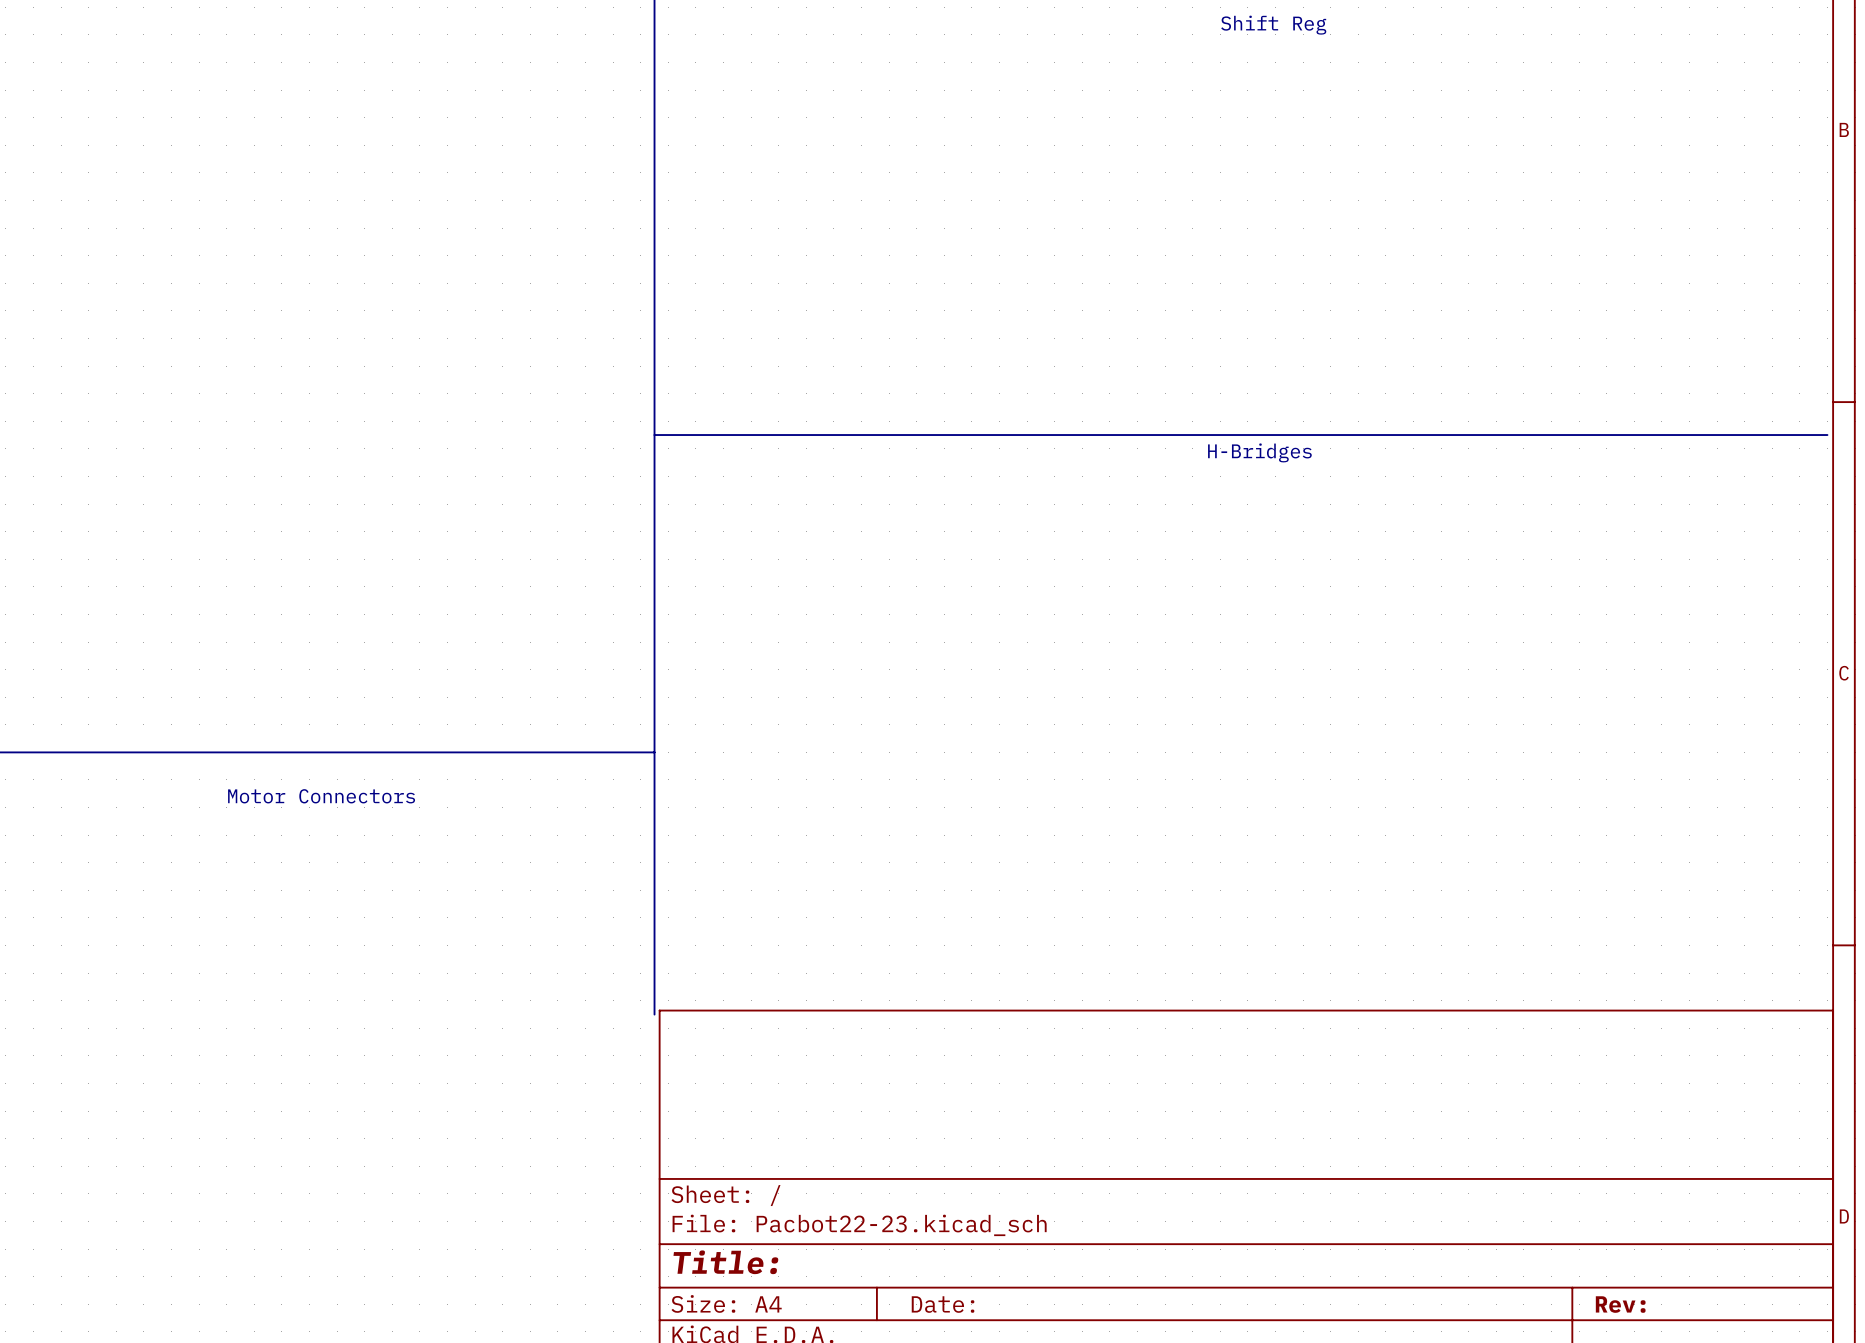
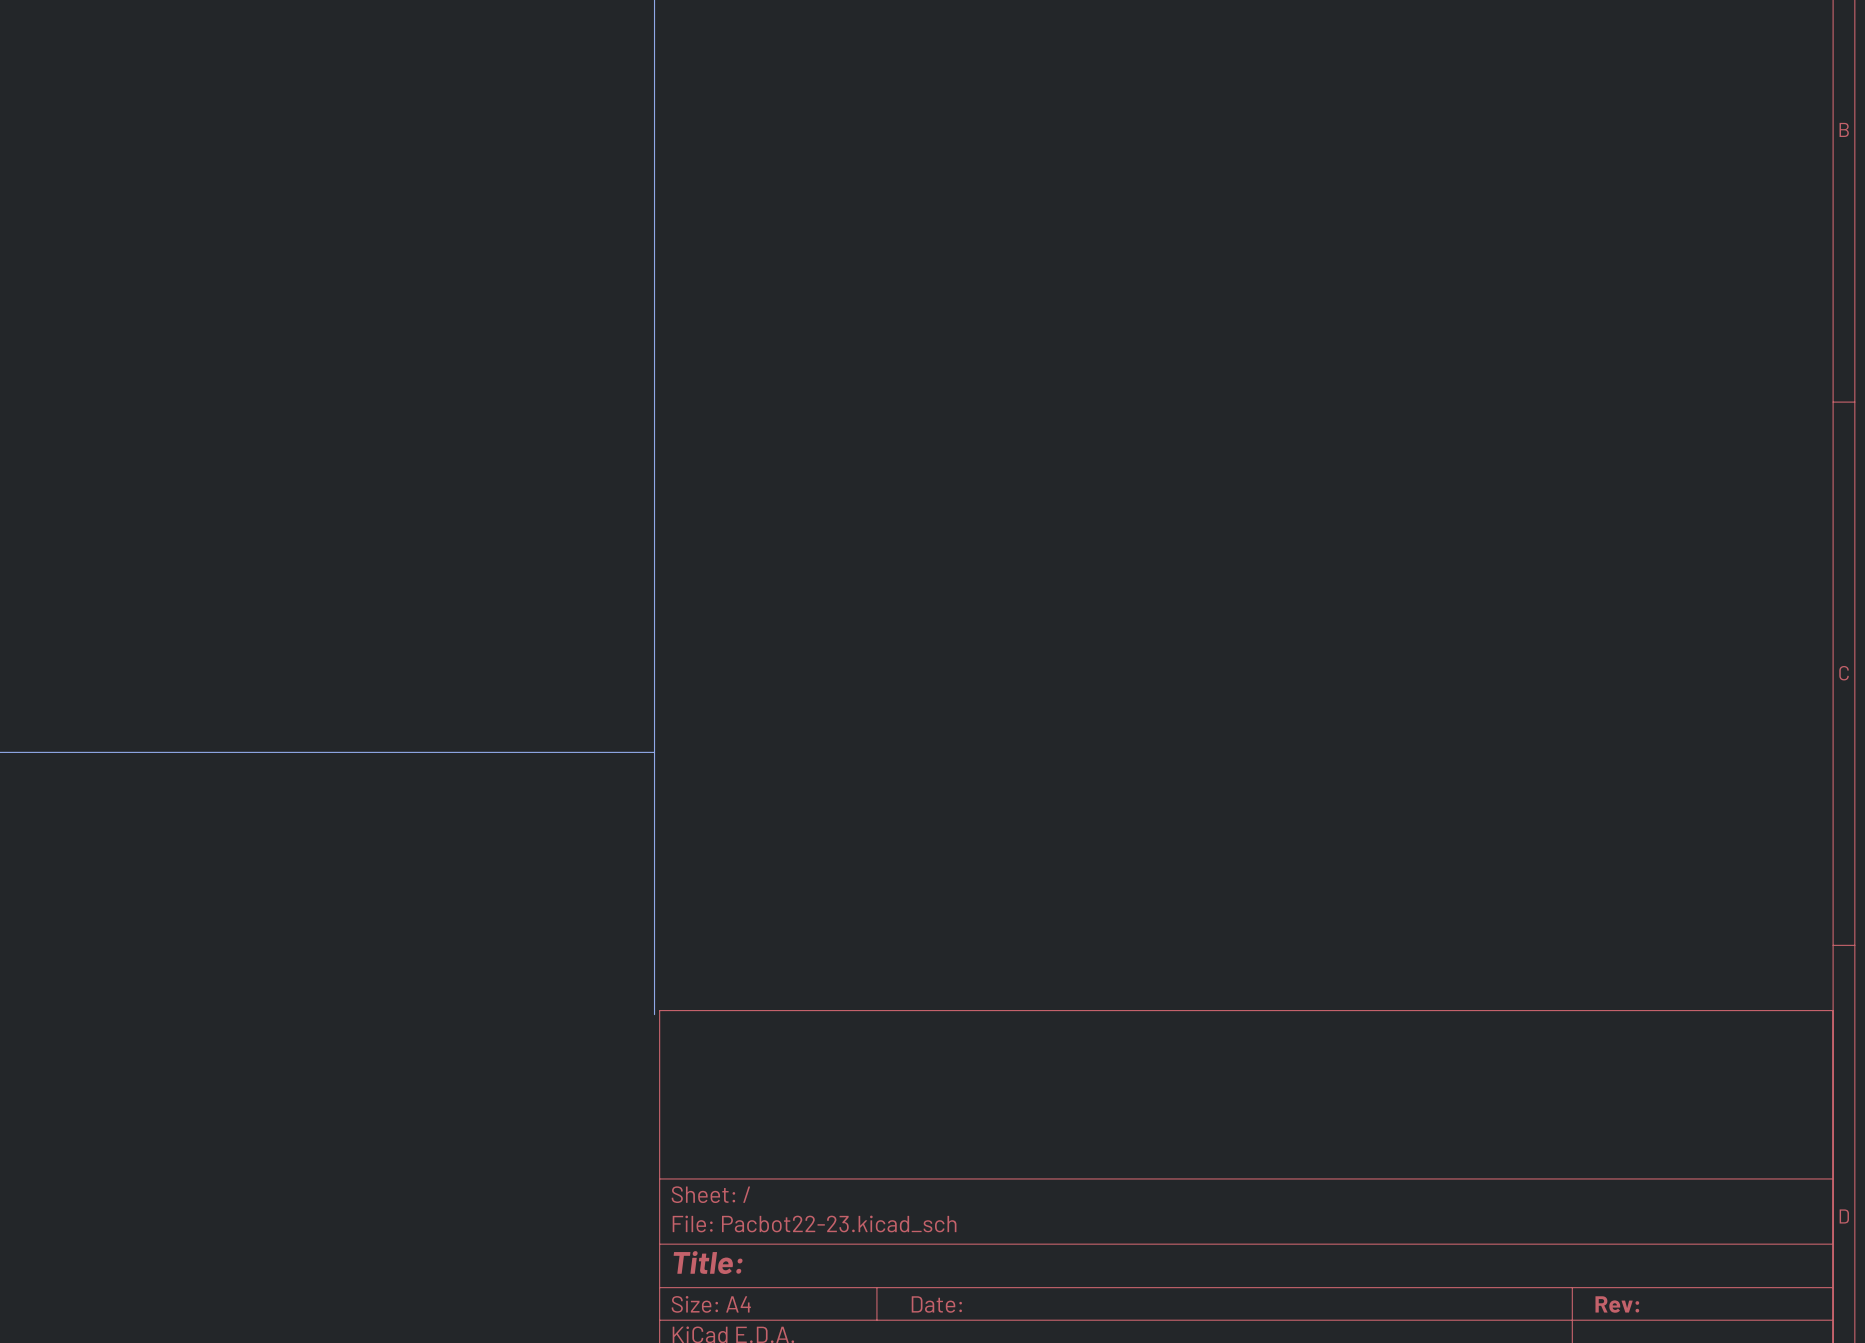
text: Shift Reg (1273, 25) -> none
line: (654, 435) (1827, 435) -> none
text: H-Bridges (1259, 452) -> none
text: Motor Connectors (321, 796) -> none

